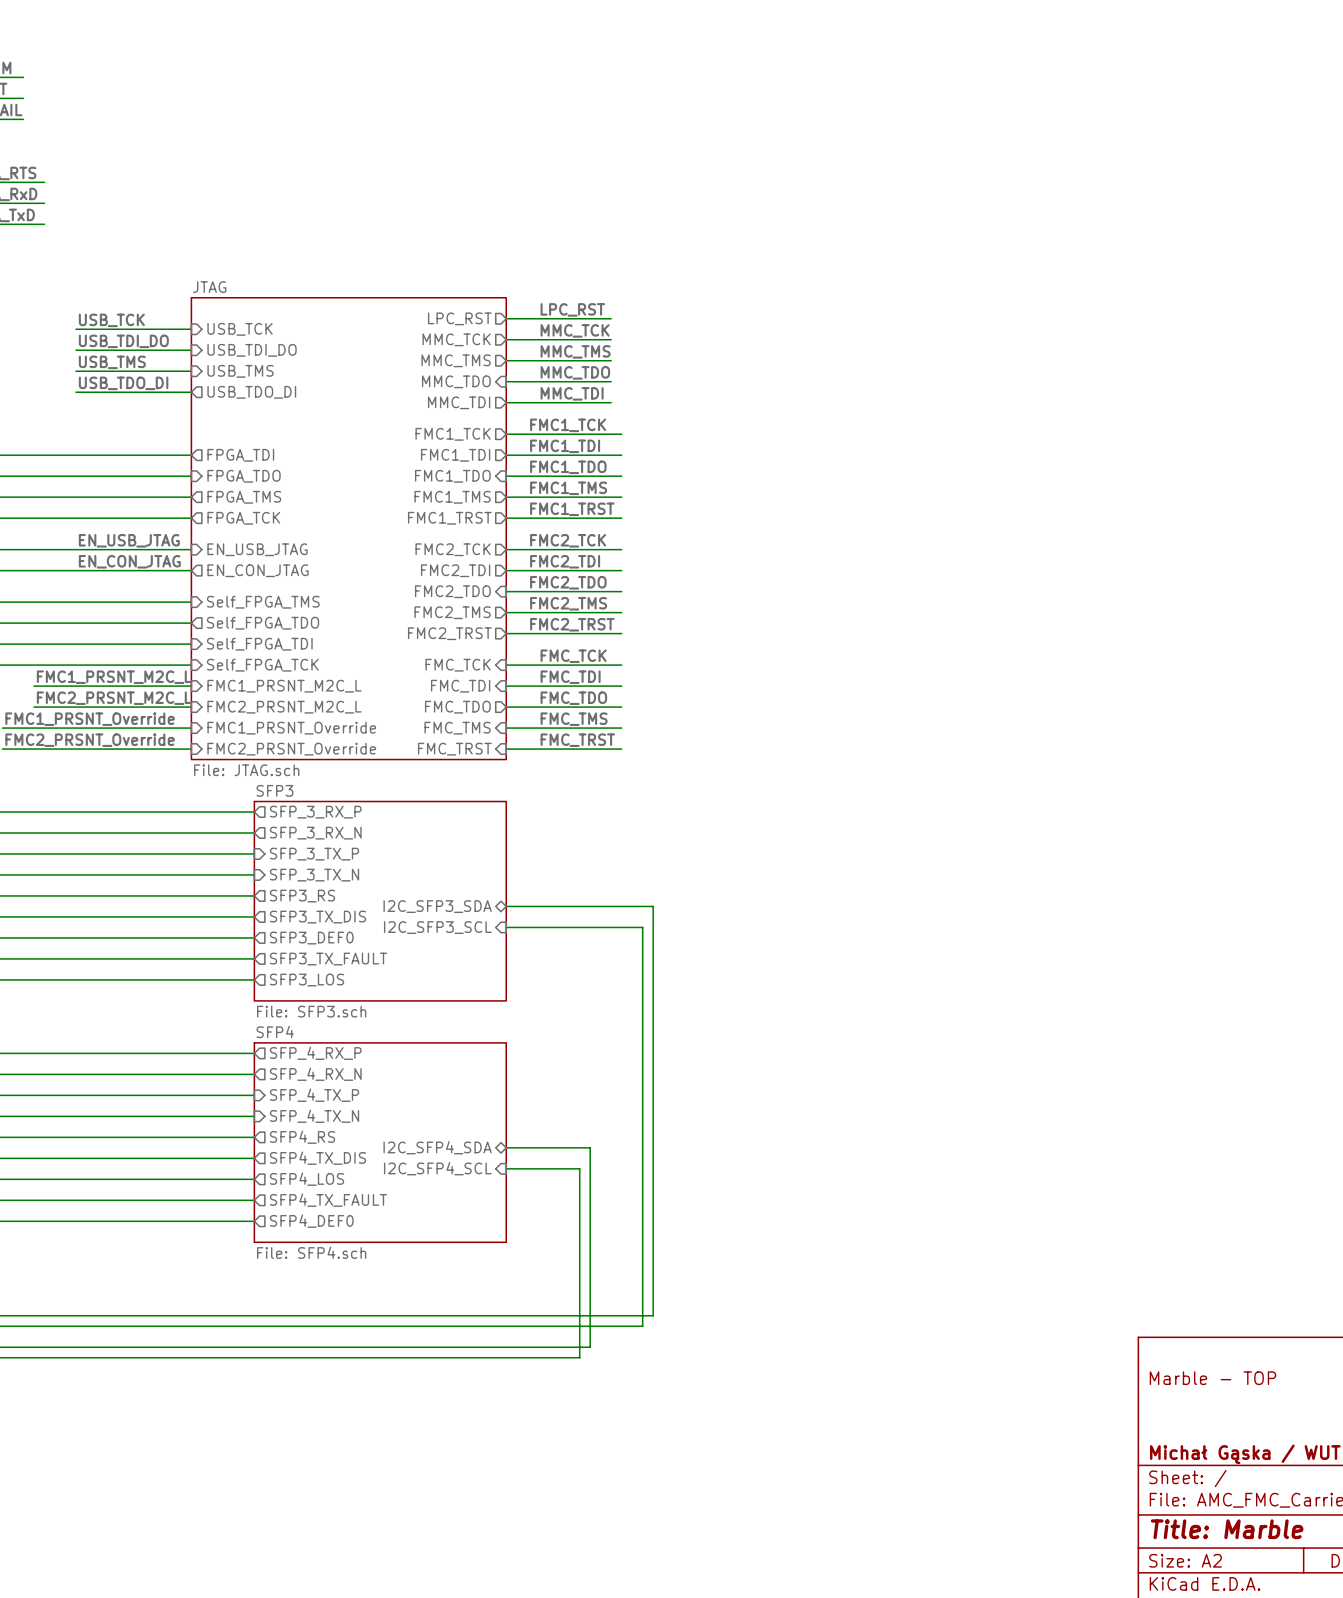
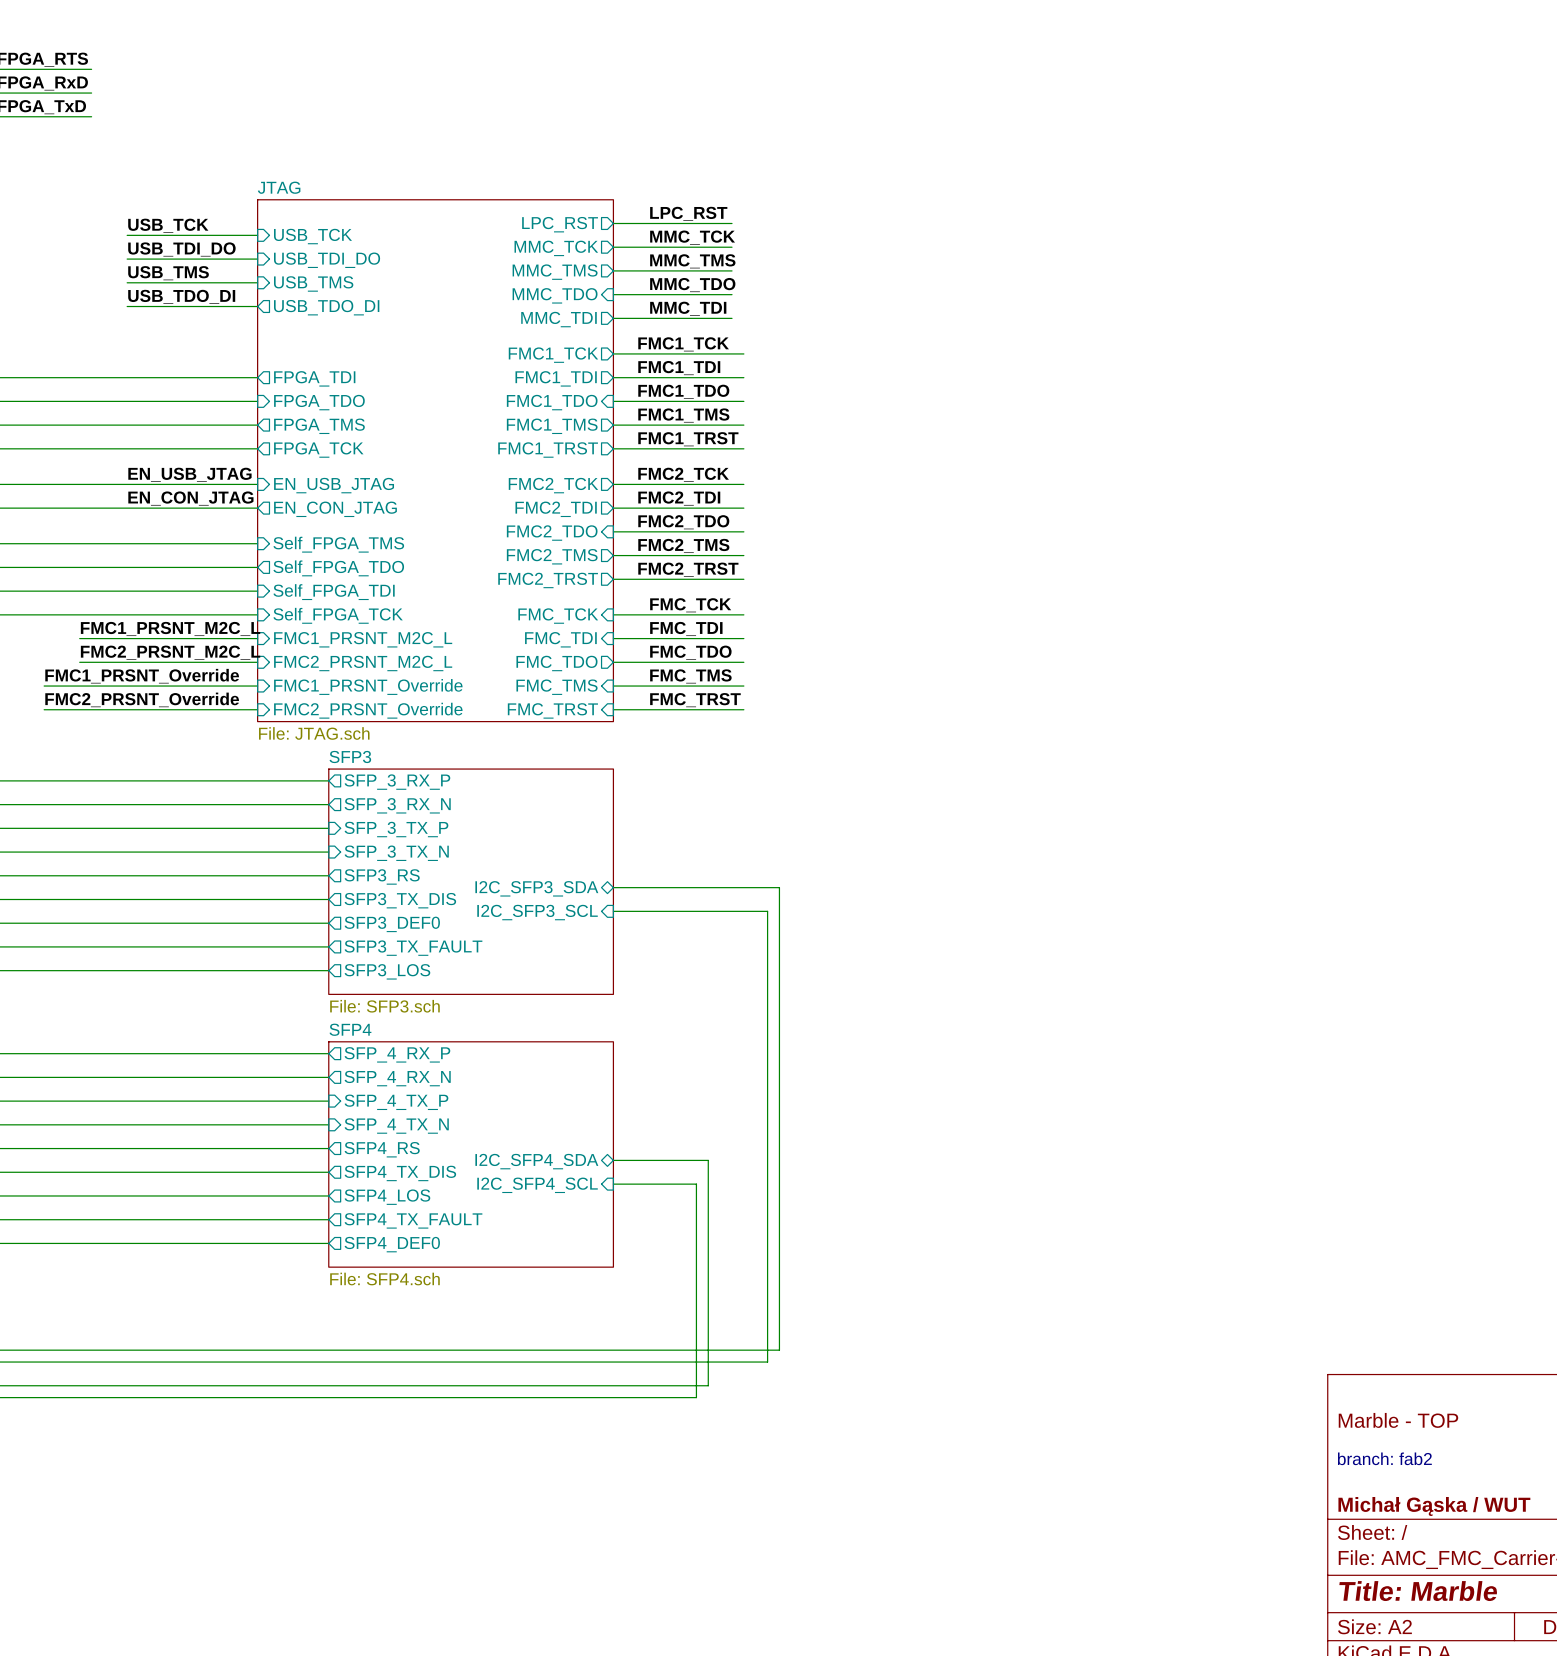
text: none -> branch: fab2 (1384, 1458)

